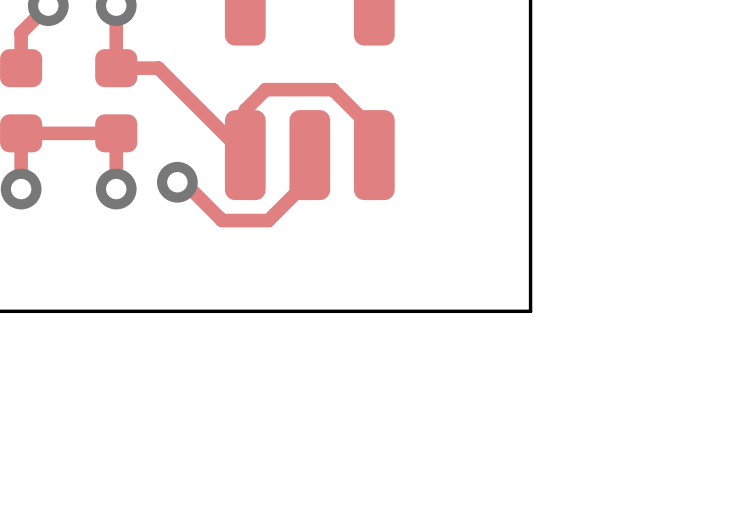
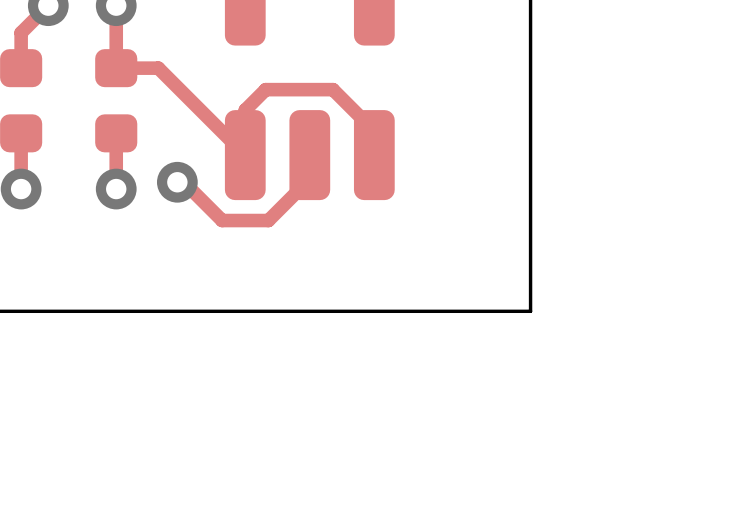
top track: (116, 133) (21, 133) -> none

